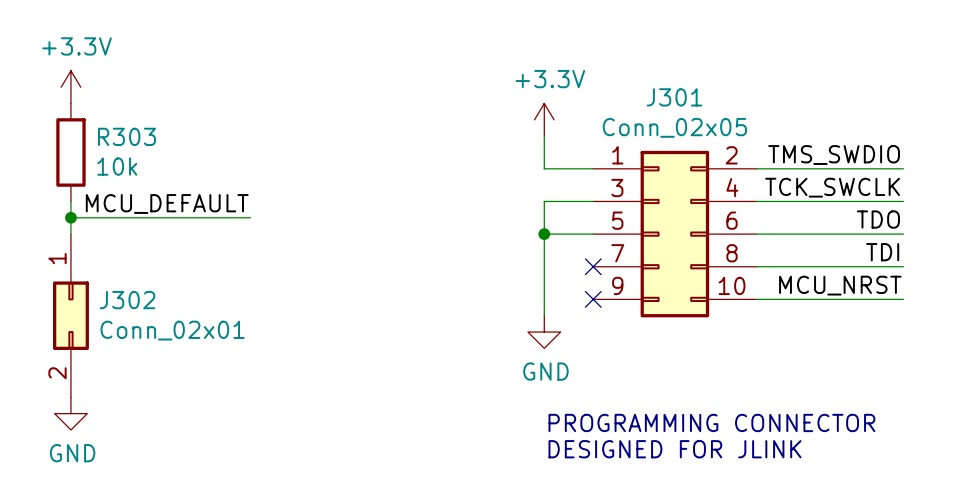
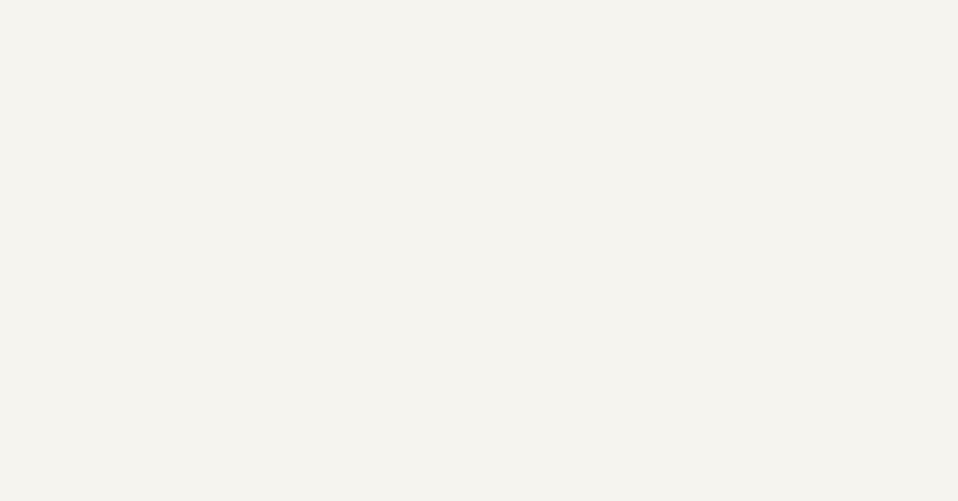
power symbol: +3.3V (70, 87) -> none
power symbol: +3.3V (544, 119) -> none
wire: (544, 136) (544, 168) (593, 168) -> none
R303: 10k (70, 152) -> none
label: TMS_SWDIO (834, 155) -> none
wire: (756, 168) (903, 168) -> none
label: TCK_SWCLK (832, 187) -> none
wire: (70, 201) (70, 234) -> none
wire: (593, 201) (544, 201) (544, 315) -> none
wire: (756, 201) (903, 201) -> none
label: MCU_DEFAULT (167, 203) -> none
wire: (70, 217) (250, 217) -> none
junction: (70, 217) -> none
label: TDO (878, 219) -> none
wire: (544, 234) (593, 234) -> none
junction: (544, 234) -> none
J301: Conn_02x05 (674, 234) -> none
wire: (756, 234) (903, 234) -> none
label: TDI (882, 252) -> none
no-connect mark: (593, 266) -> none
wire: (756, 266) (903, 266) -> none
label: MCU_NRST (840, 285) -> none
no-connect mark: (593, 299) -> none
wire: (756, 299) (903, 299) -> none
J302: Conn_02x01 (70, 315) -> none
power symbol: GND (544, 332) -> none
power symbol: GND (70, 413) -> none
text: PROGRAMMING CONNECTOR (711, 422) -> none
text: DESIGNED FOR JLINK (675, 449) -> none

